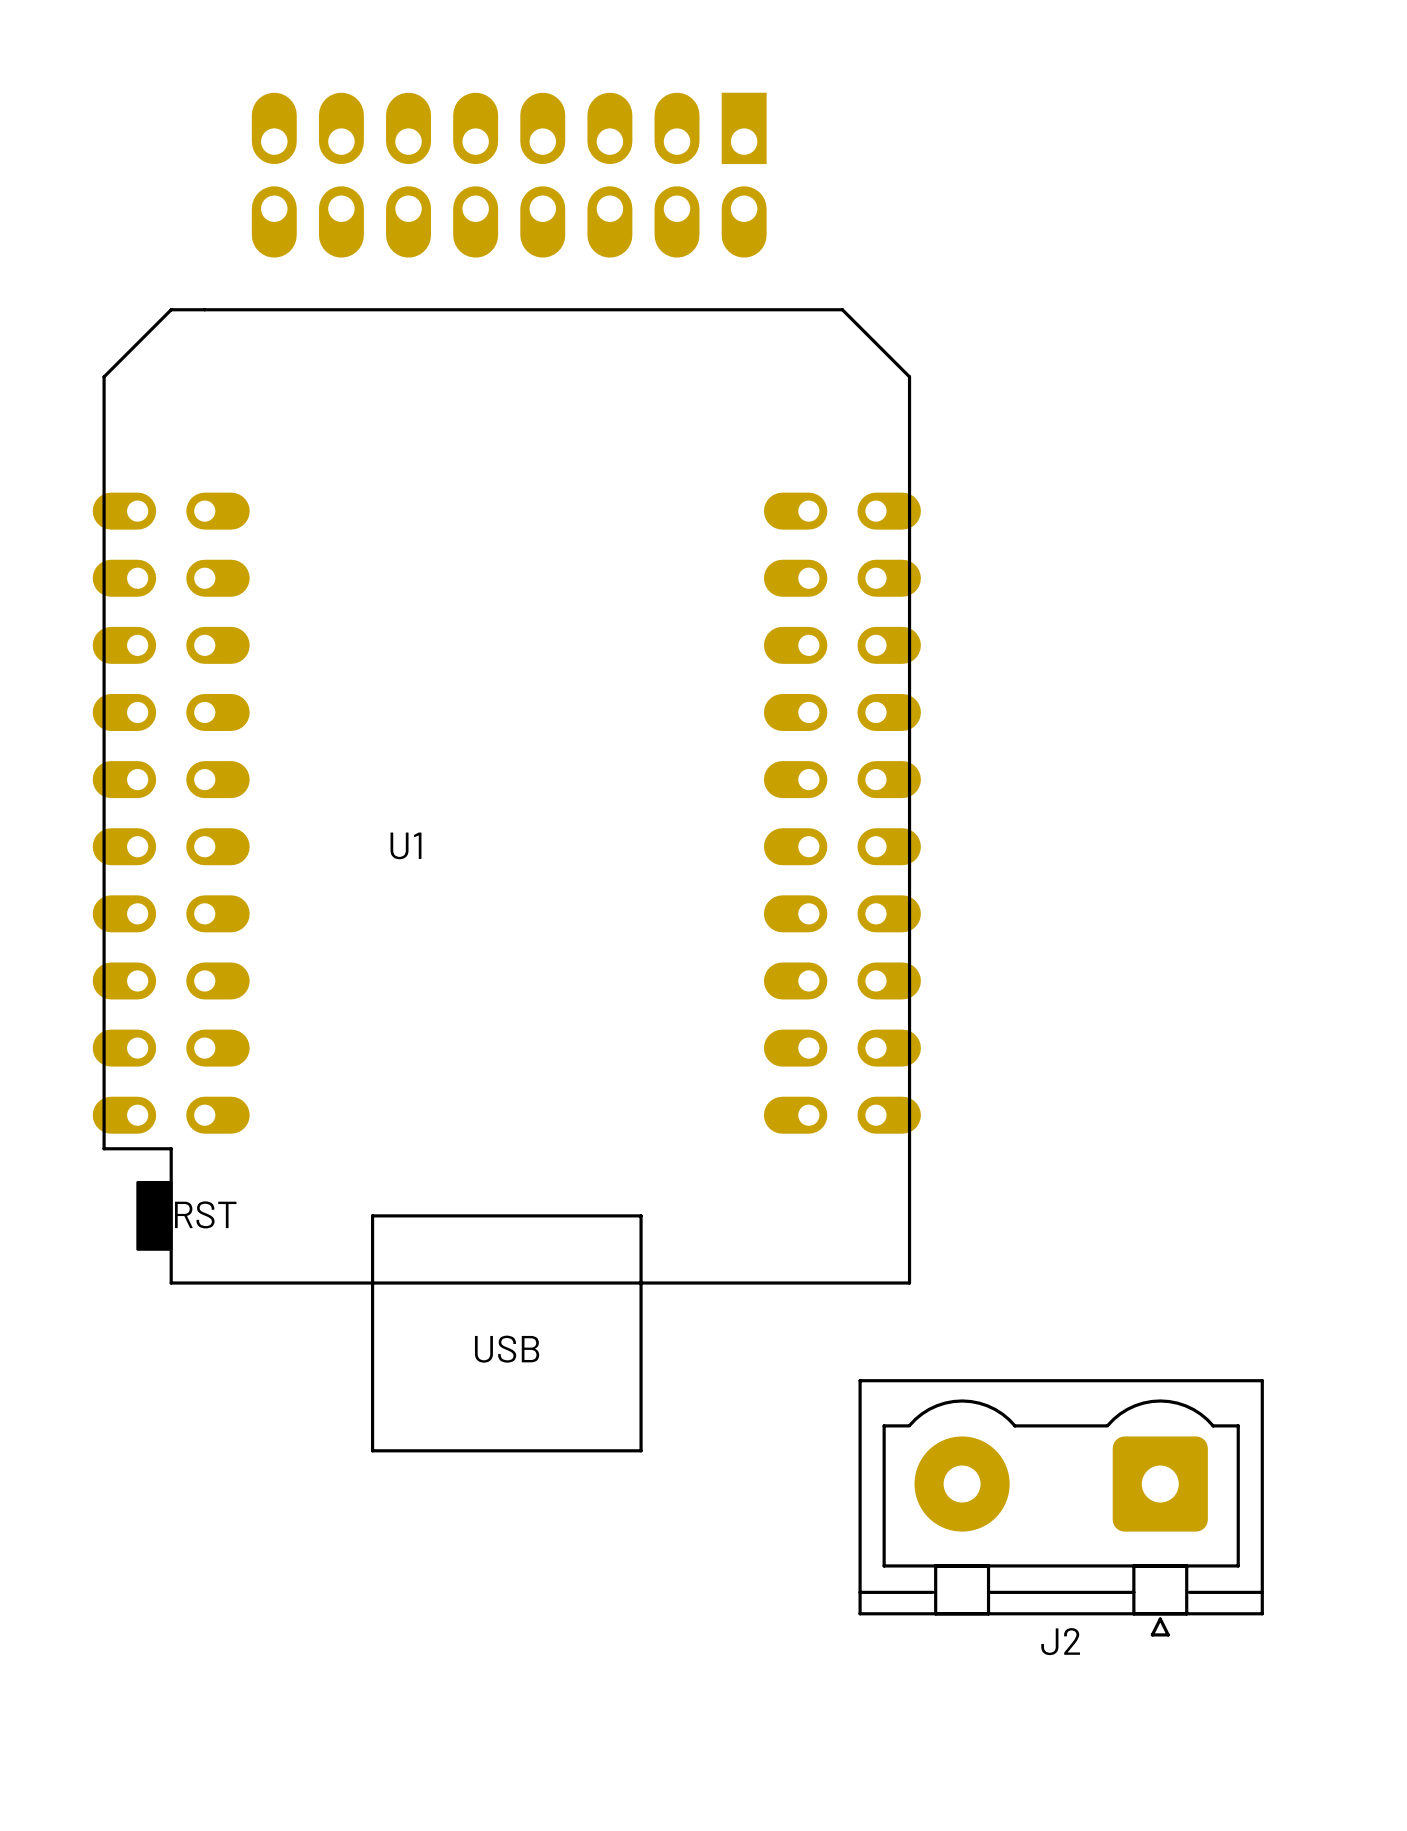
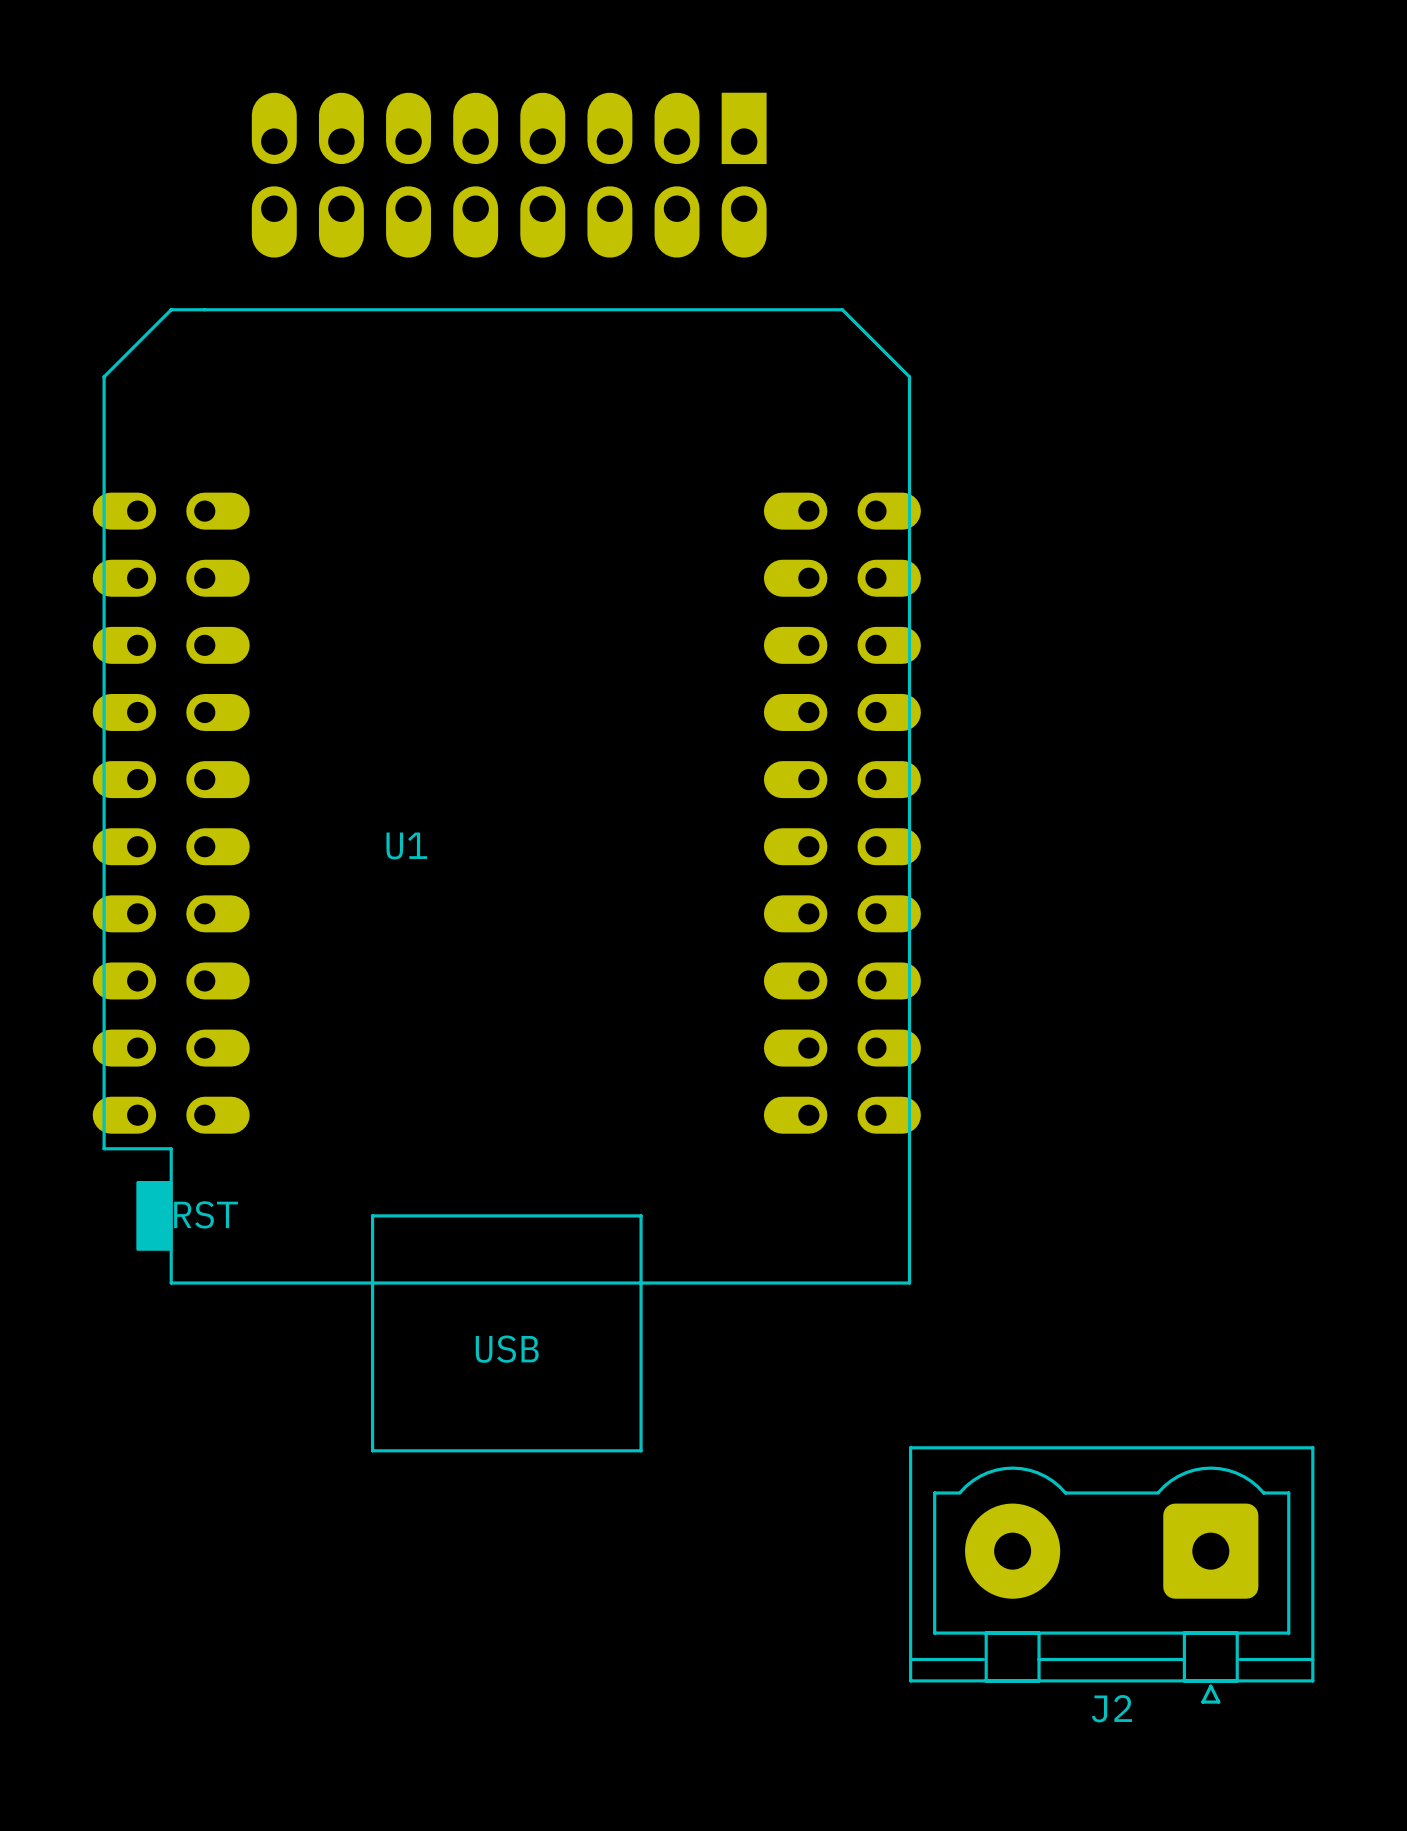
J2 position: (1061, 1507) -> (1111, 1574)

